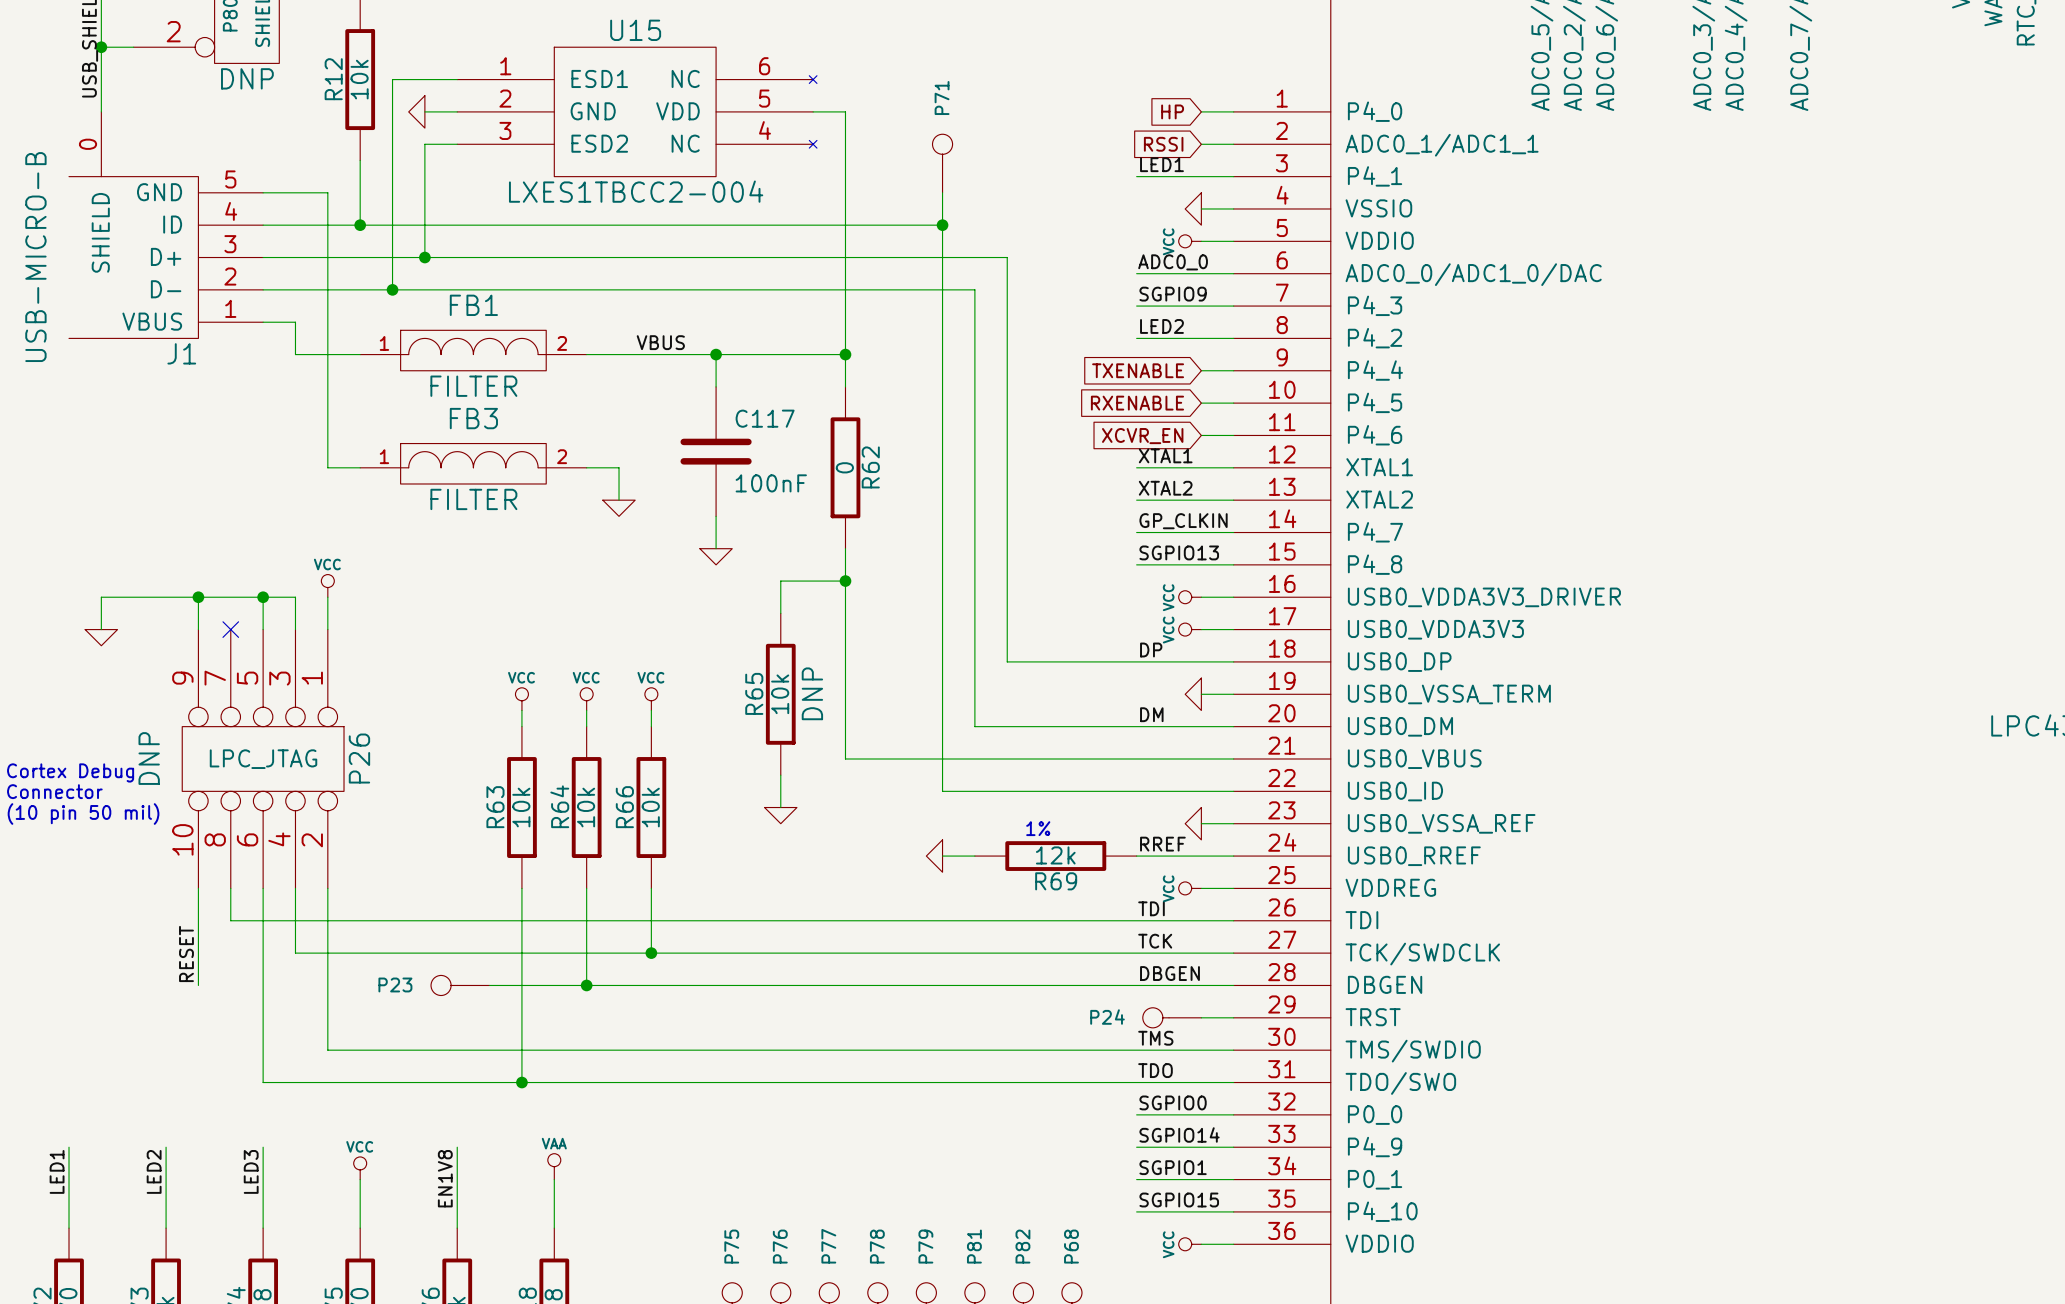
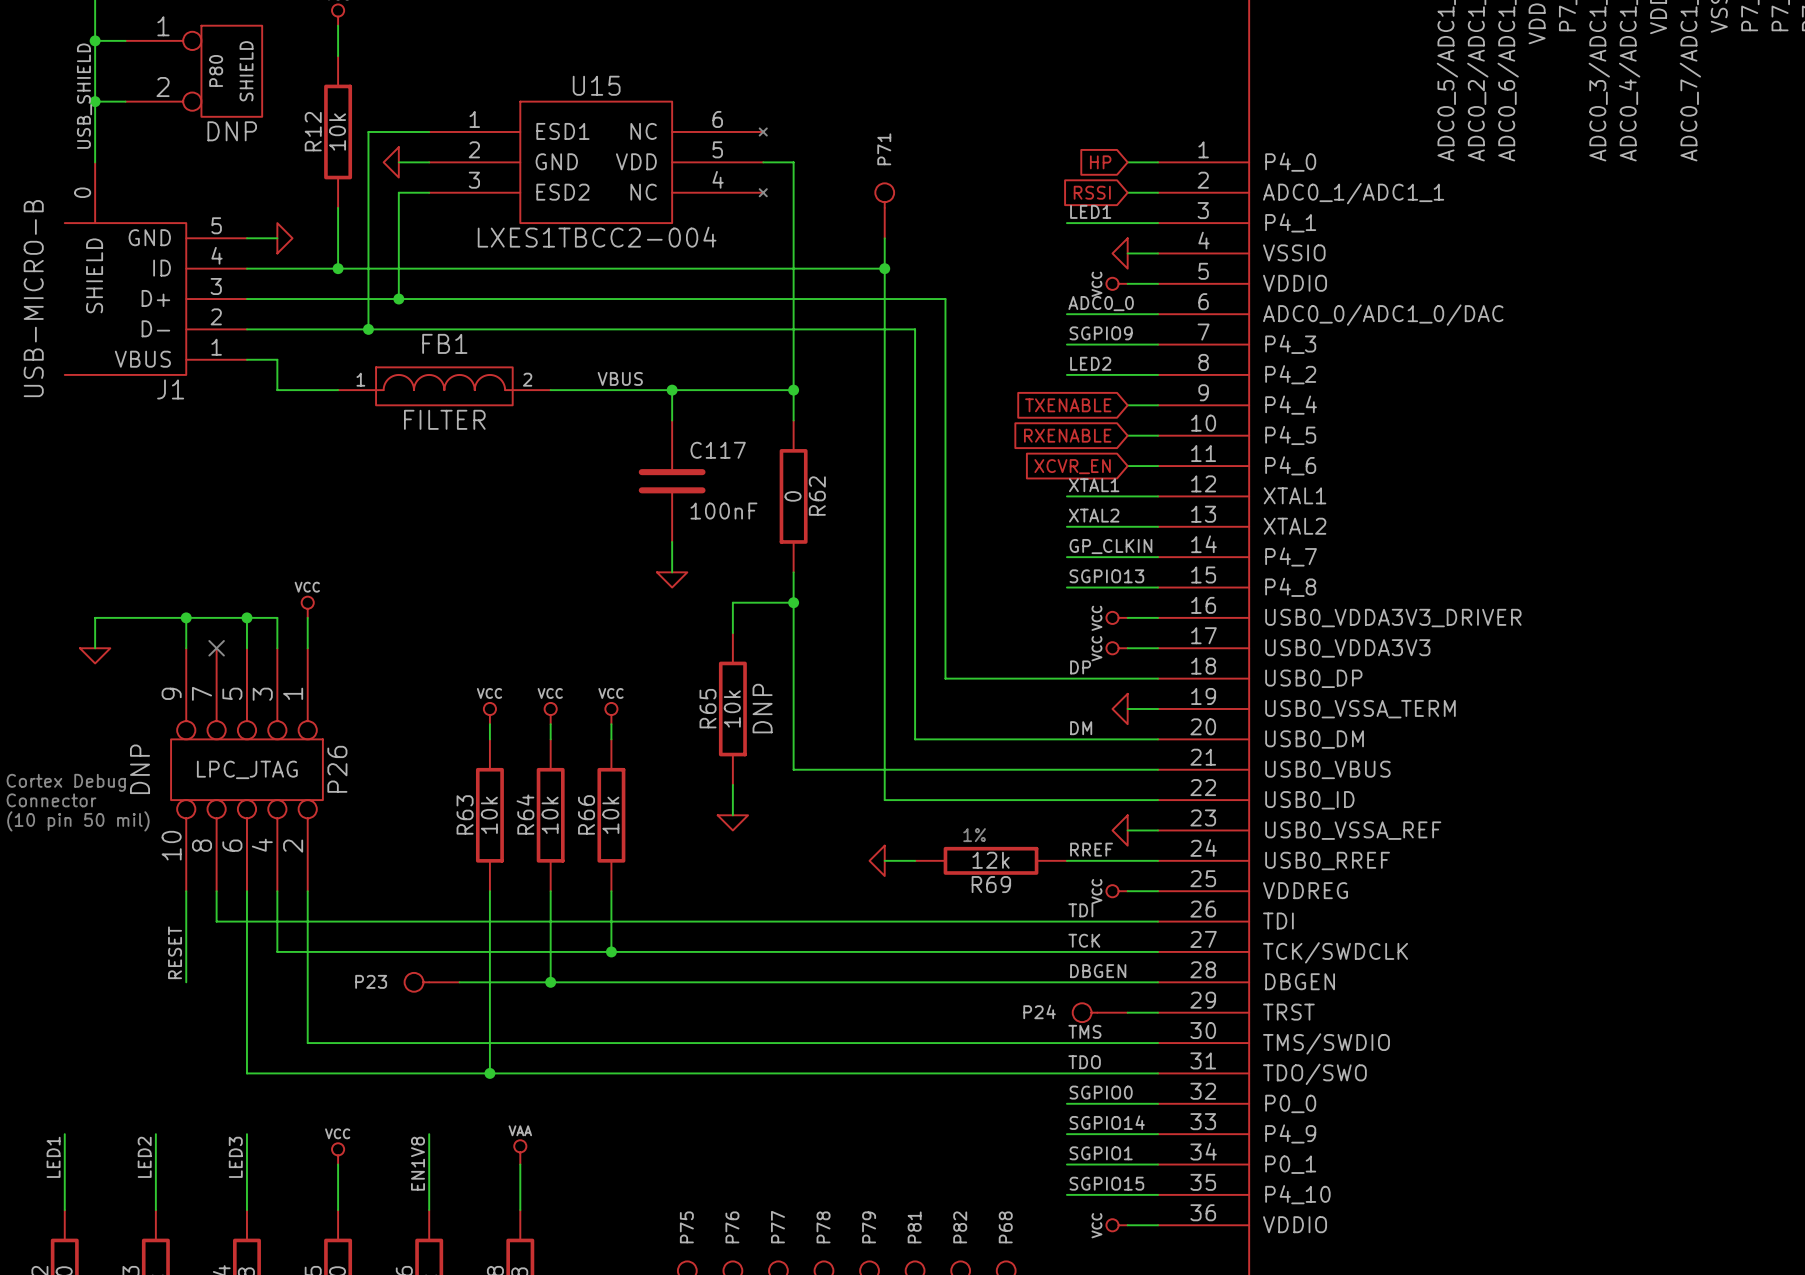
wire: (295, 192) (327, 192) (327, 467) (360, 467) -> none
power symbol: none -> (284, 238)
FB3: FILTER (473, 463) -> none
wire: (586, 467) (619, 467) (619, 500) -> none
power symbol: (619, 508) -> none

